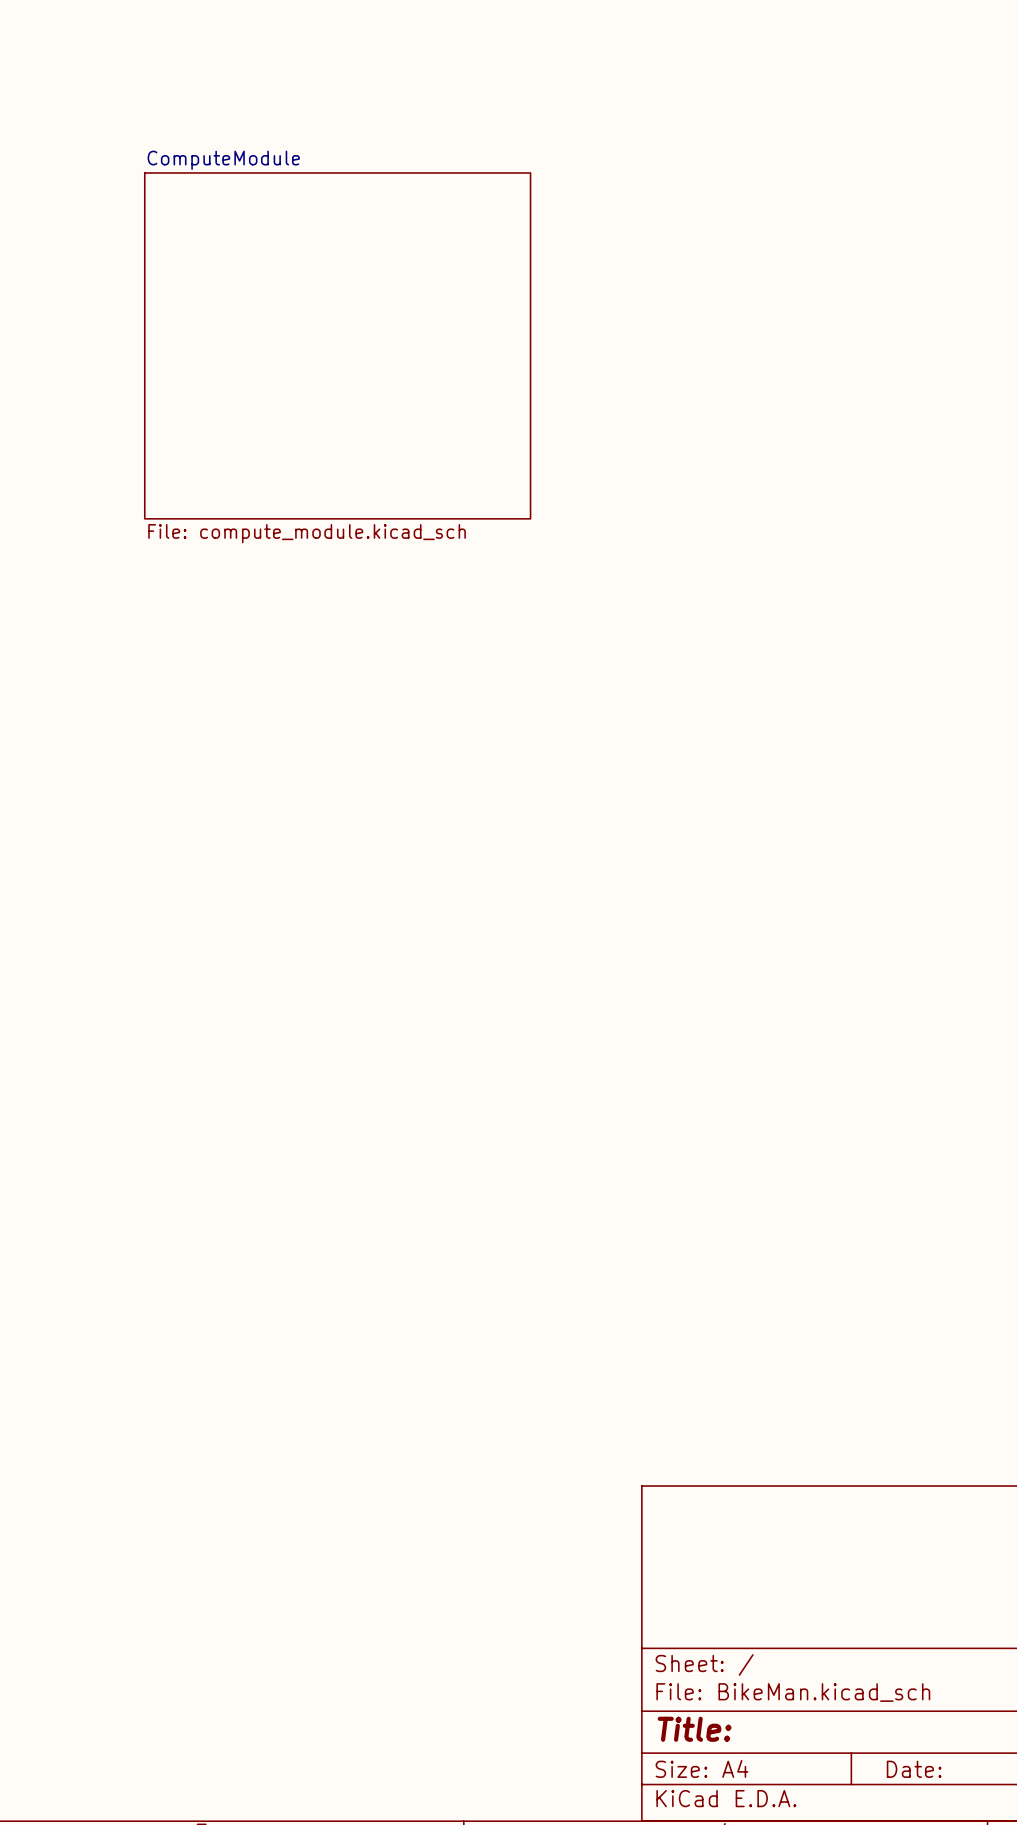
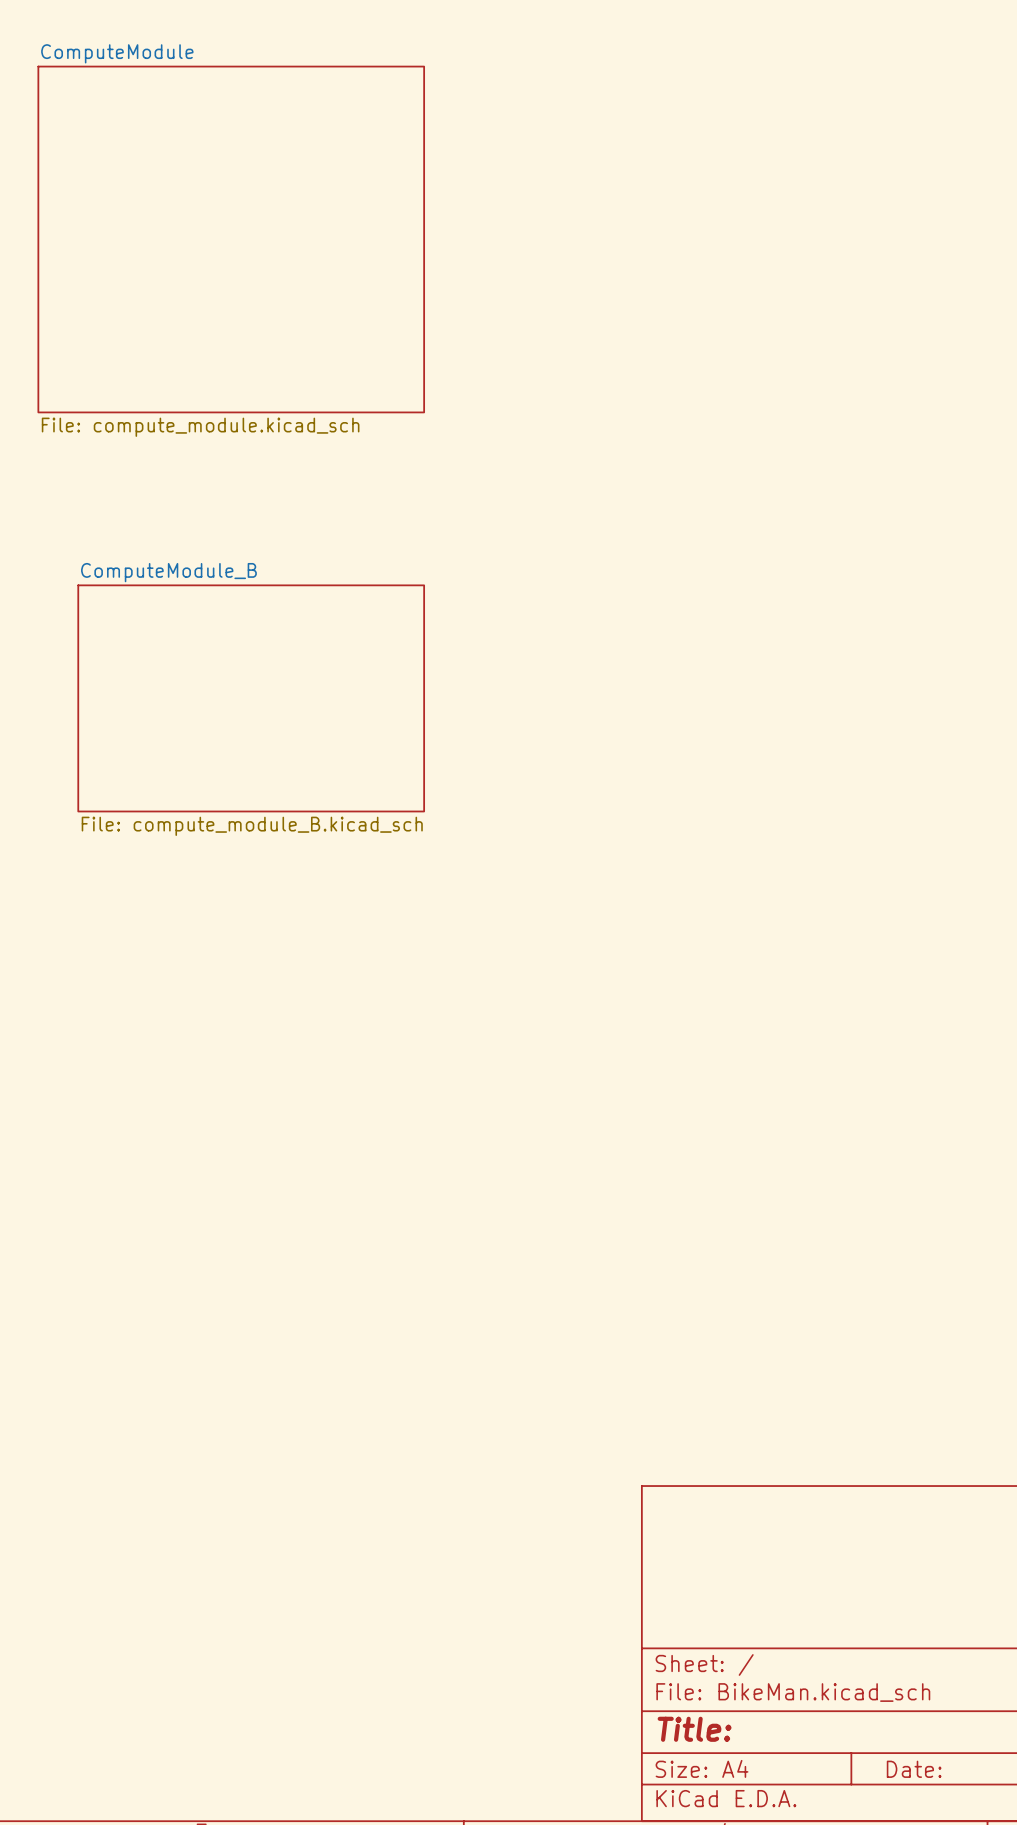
sheet ComputeModule position: (337, 345) -> (231, 239)
sheet ComputeModule_B: none -> File: compute_module_B.kicad_sch (251, 698)

